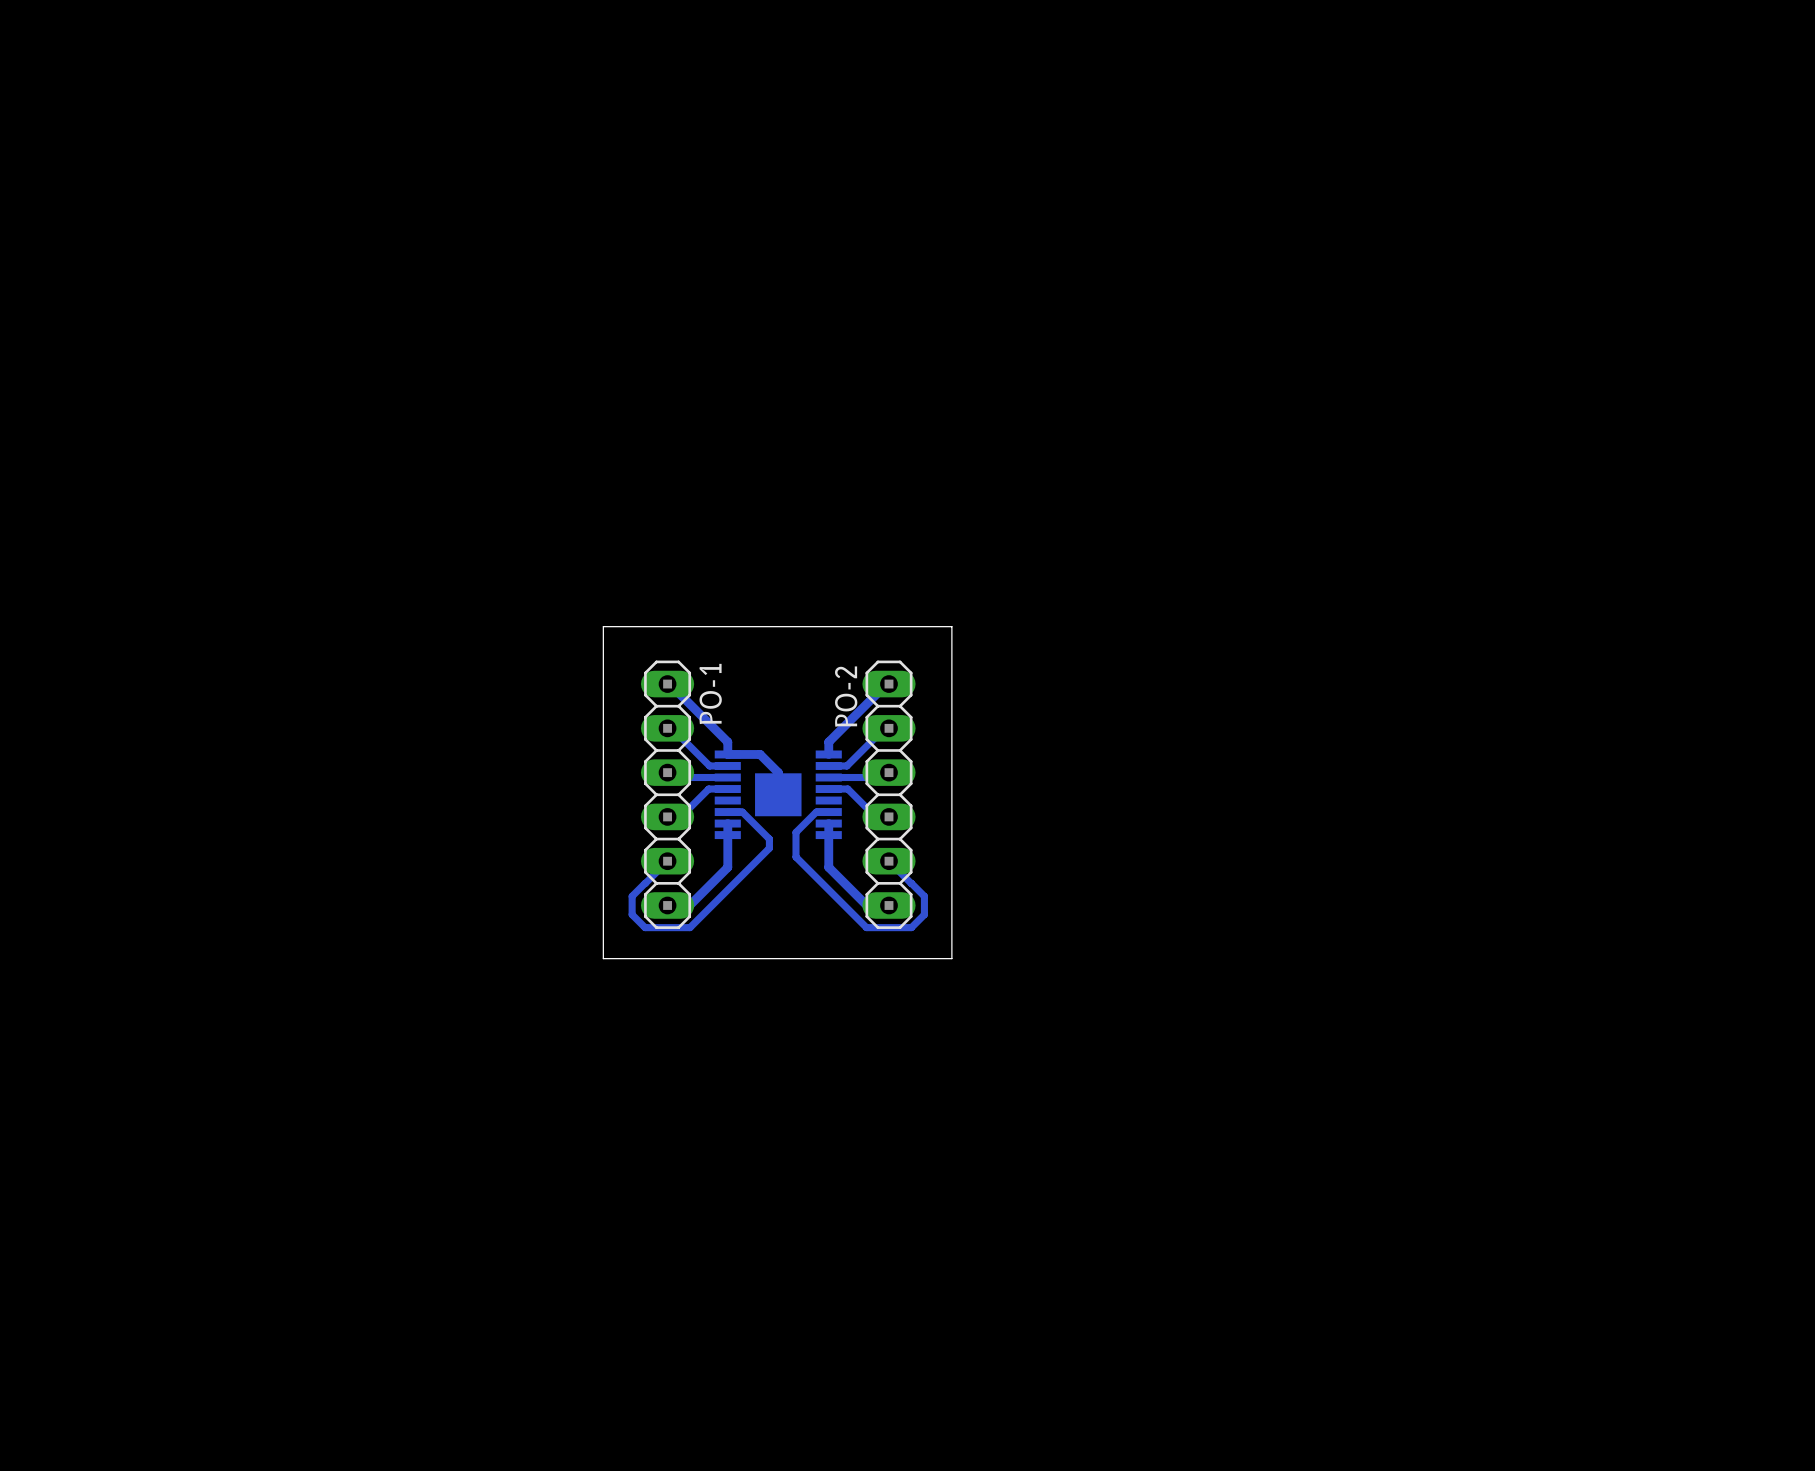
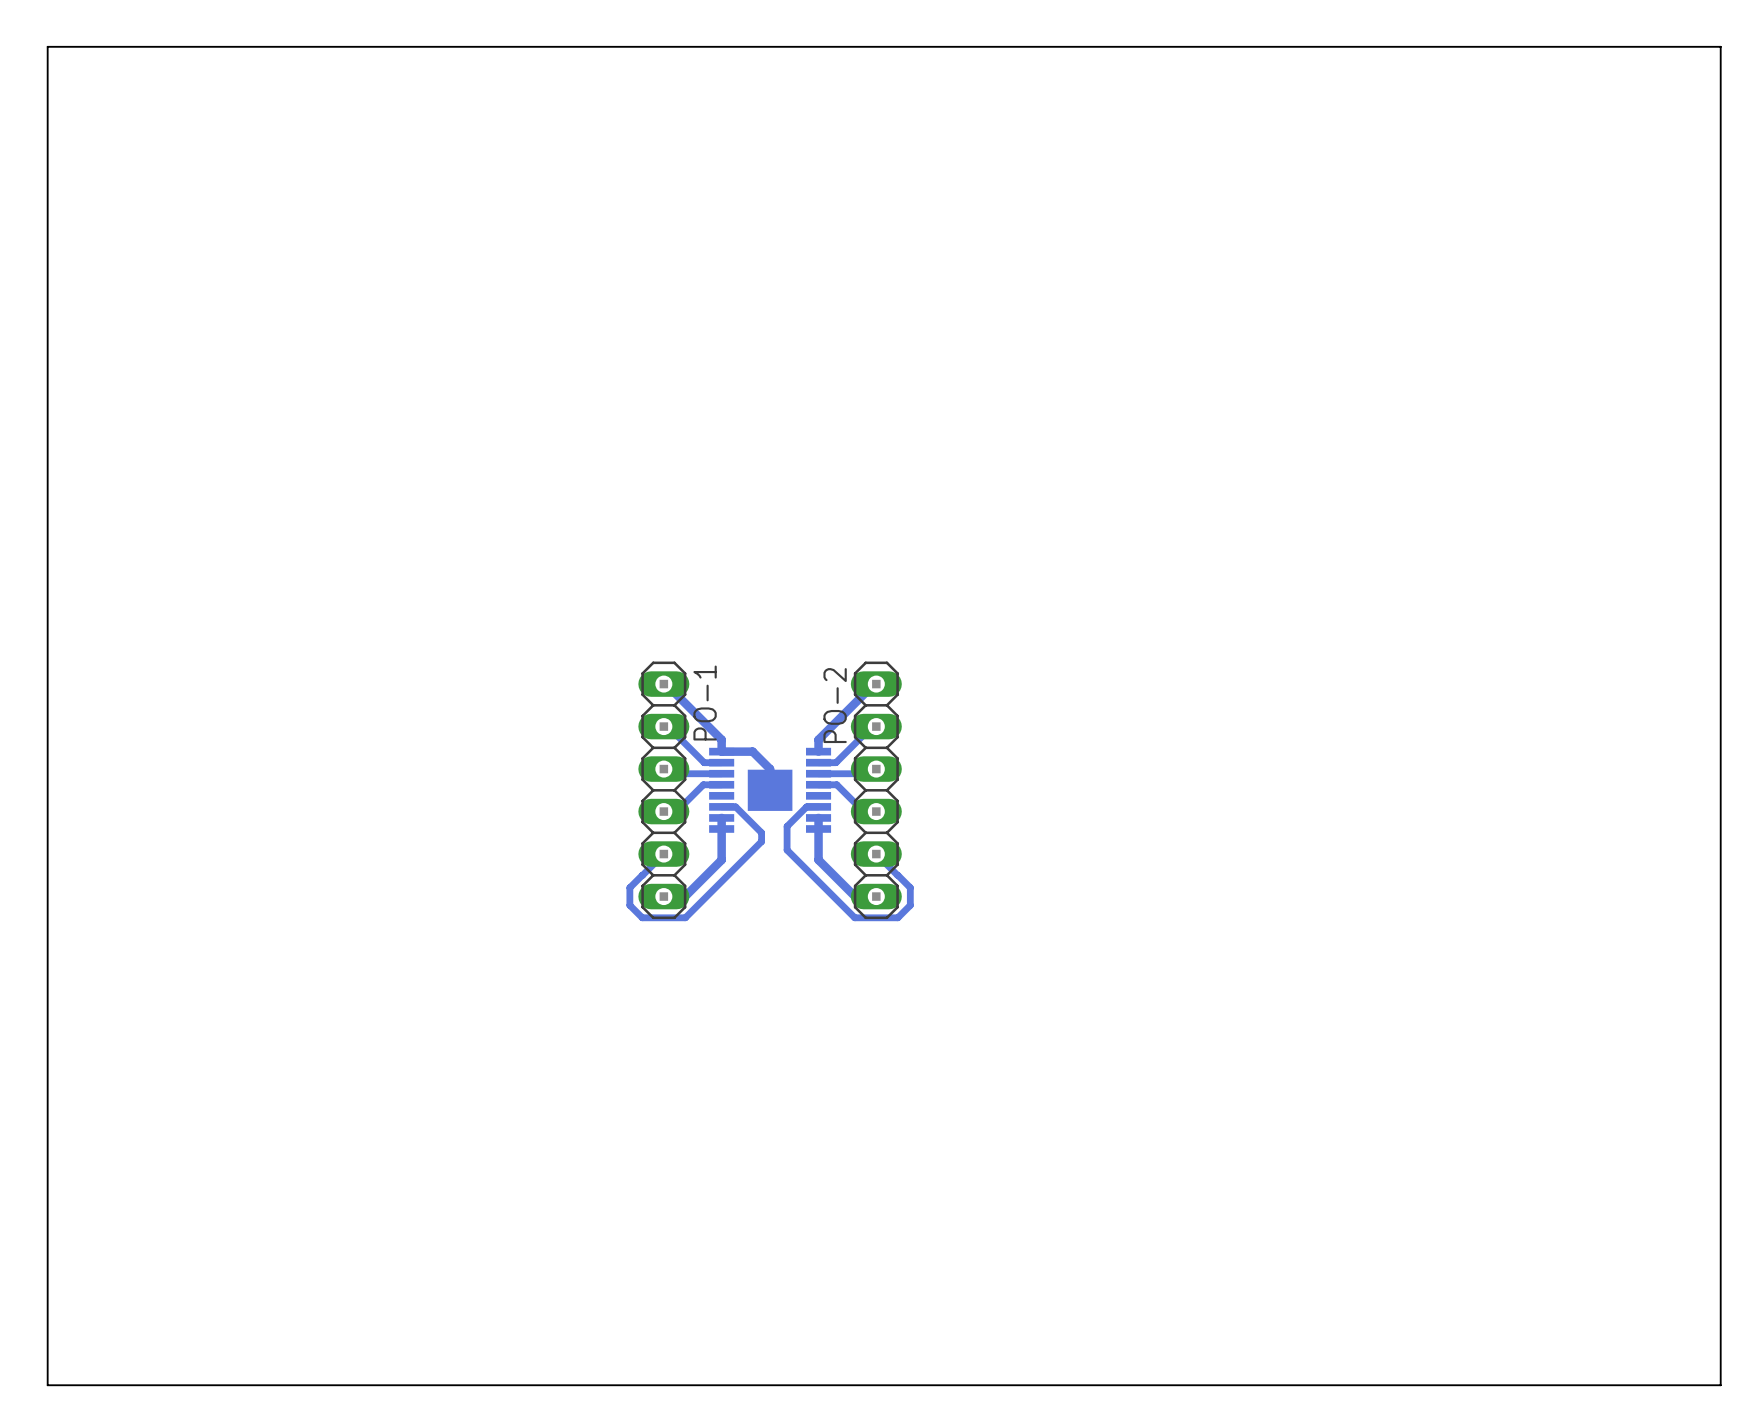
board edge: none -> (47, 46) (1720, 46) (1720, 1385) (47, 1385) (47, 46)
board edge: (603, 626) (951, 626) (951, 958) (603, 958) (603, 626) -> none

